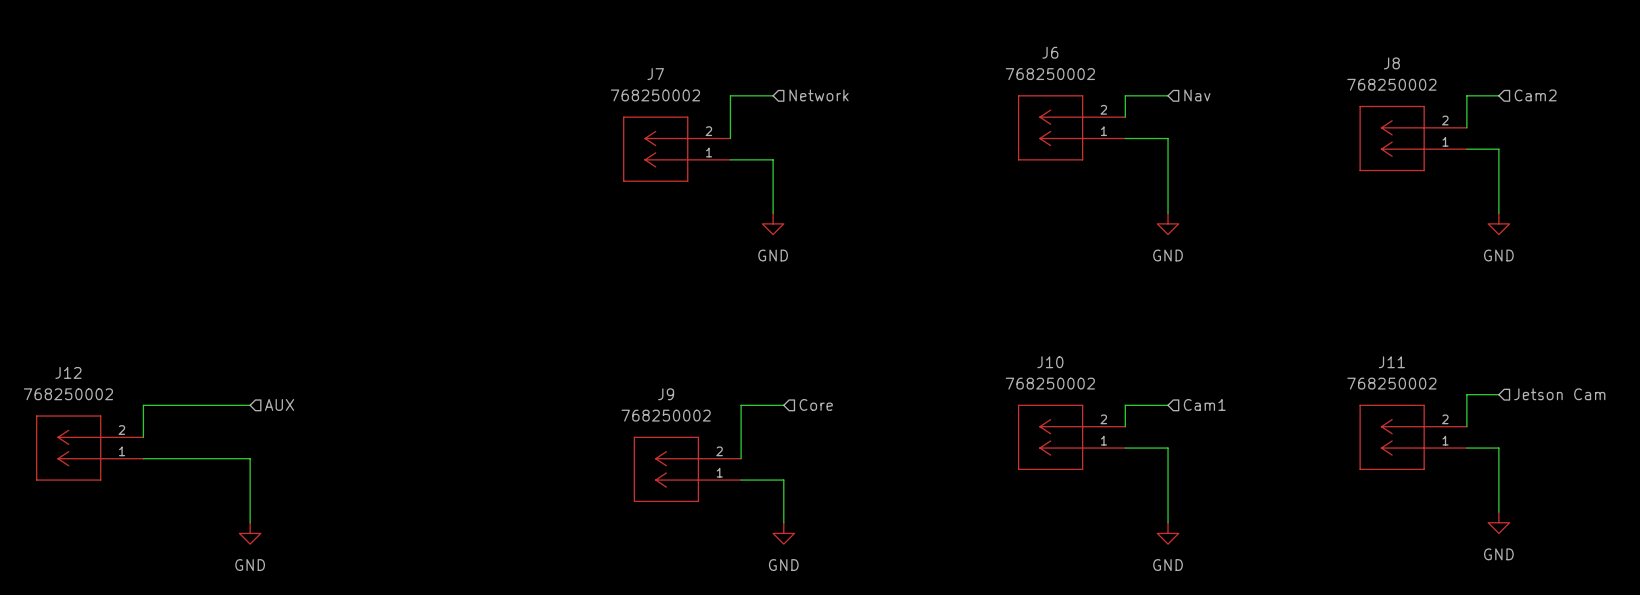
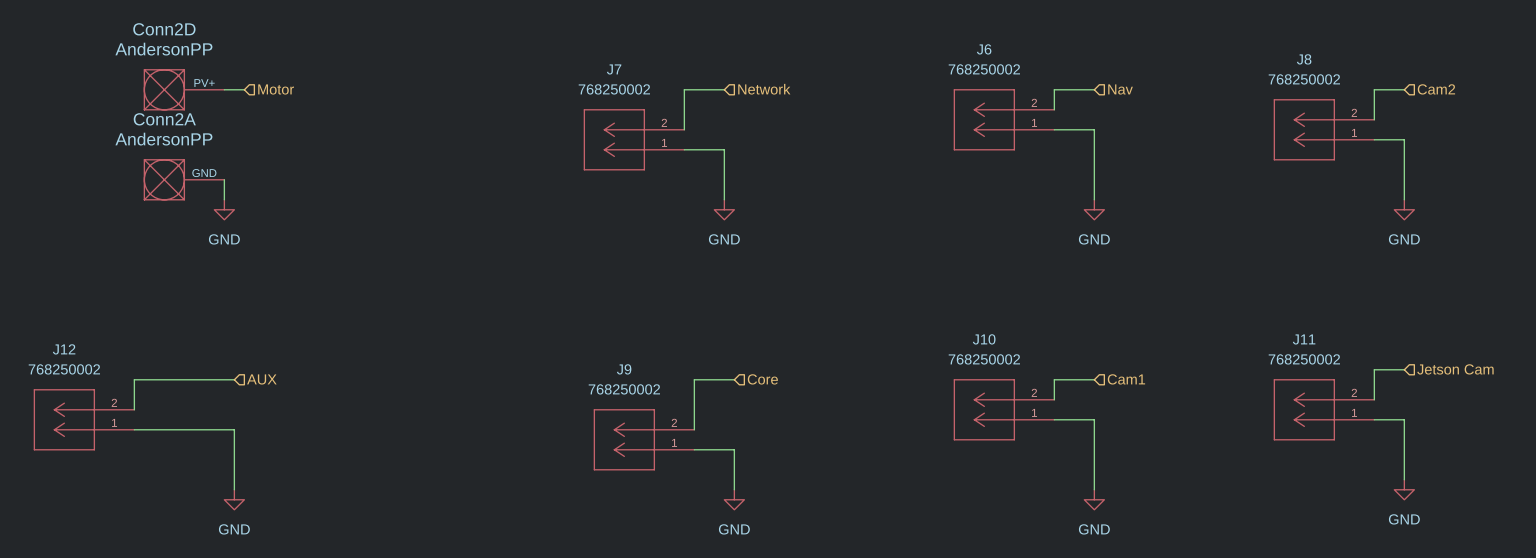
Conn2D: none -> AndersonPP (184, 89)
wire: none -> (224, 89) (244, 89)
hierarchical label: none -> Motor (276, 89)
Conn2A: none -> AndersonPP (184, 179)
wire: none -> (224, 179) (224, 199)
power symbol: none -> GND (224, 209)

